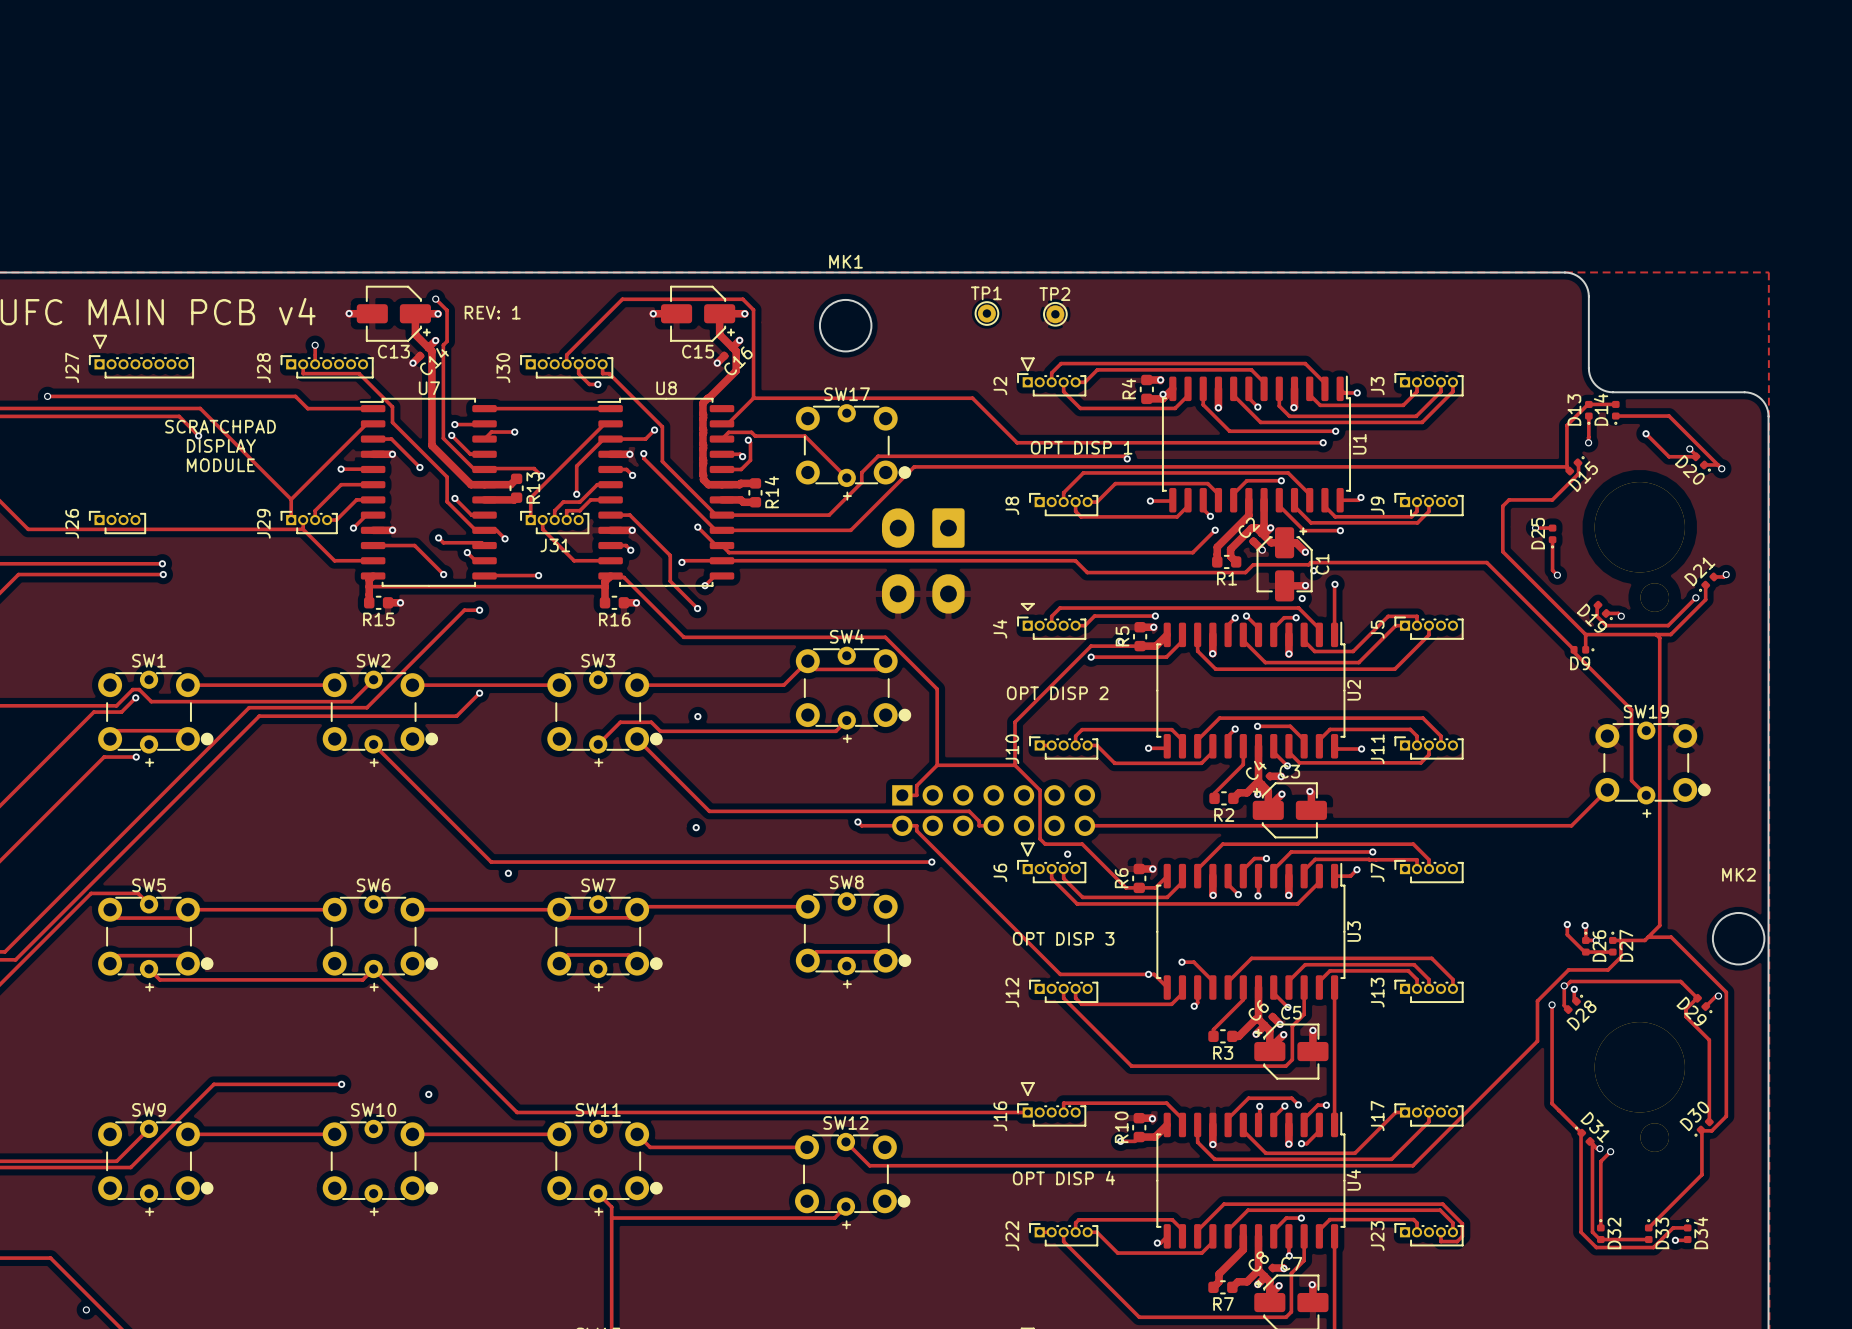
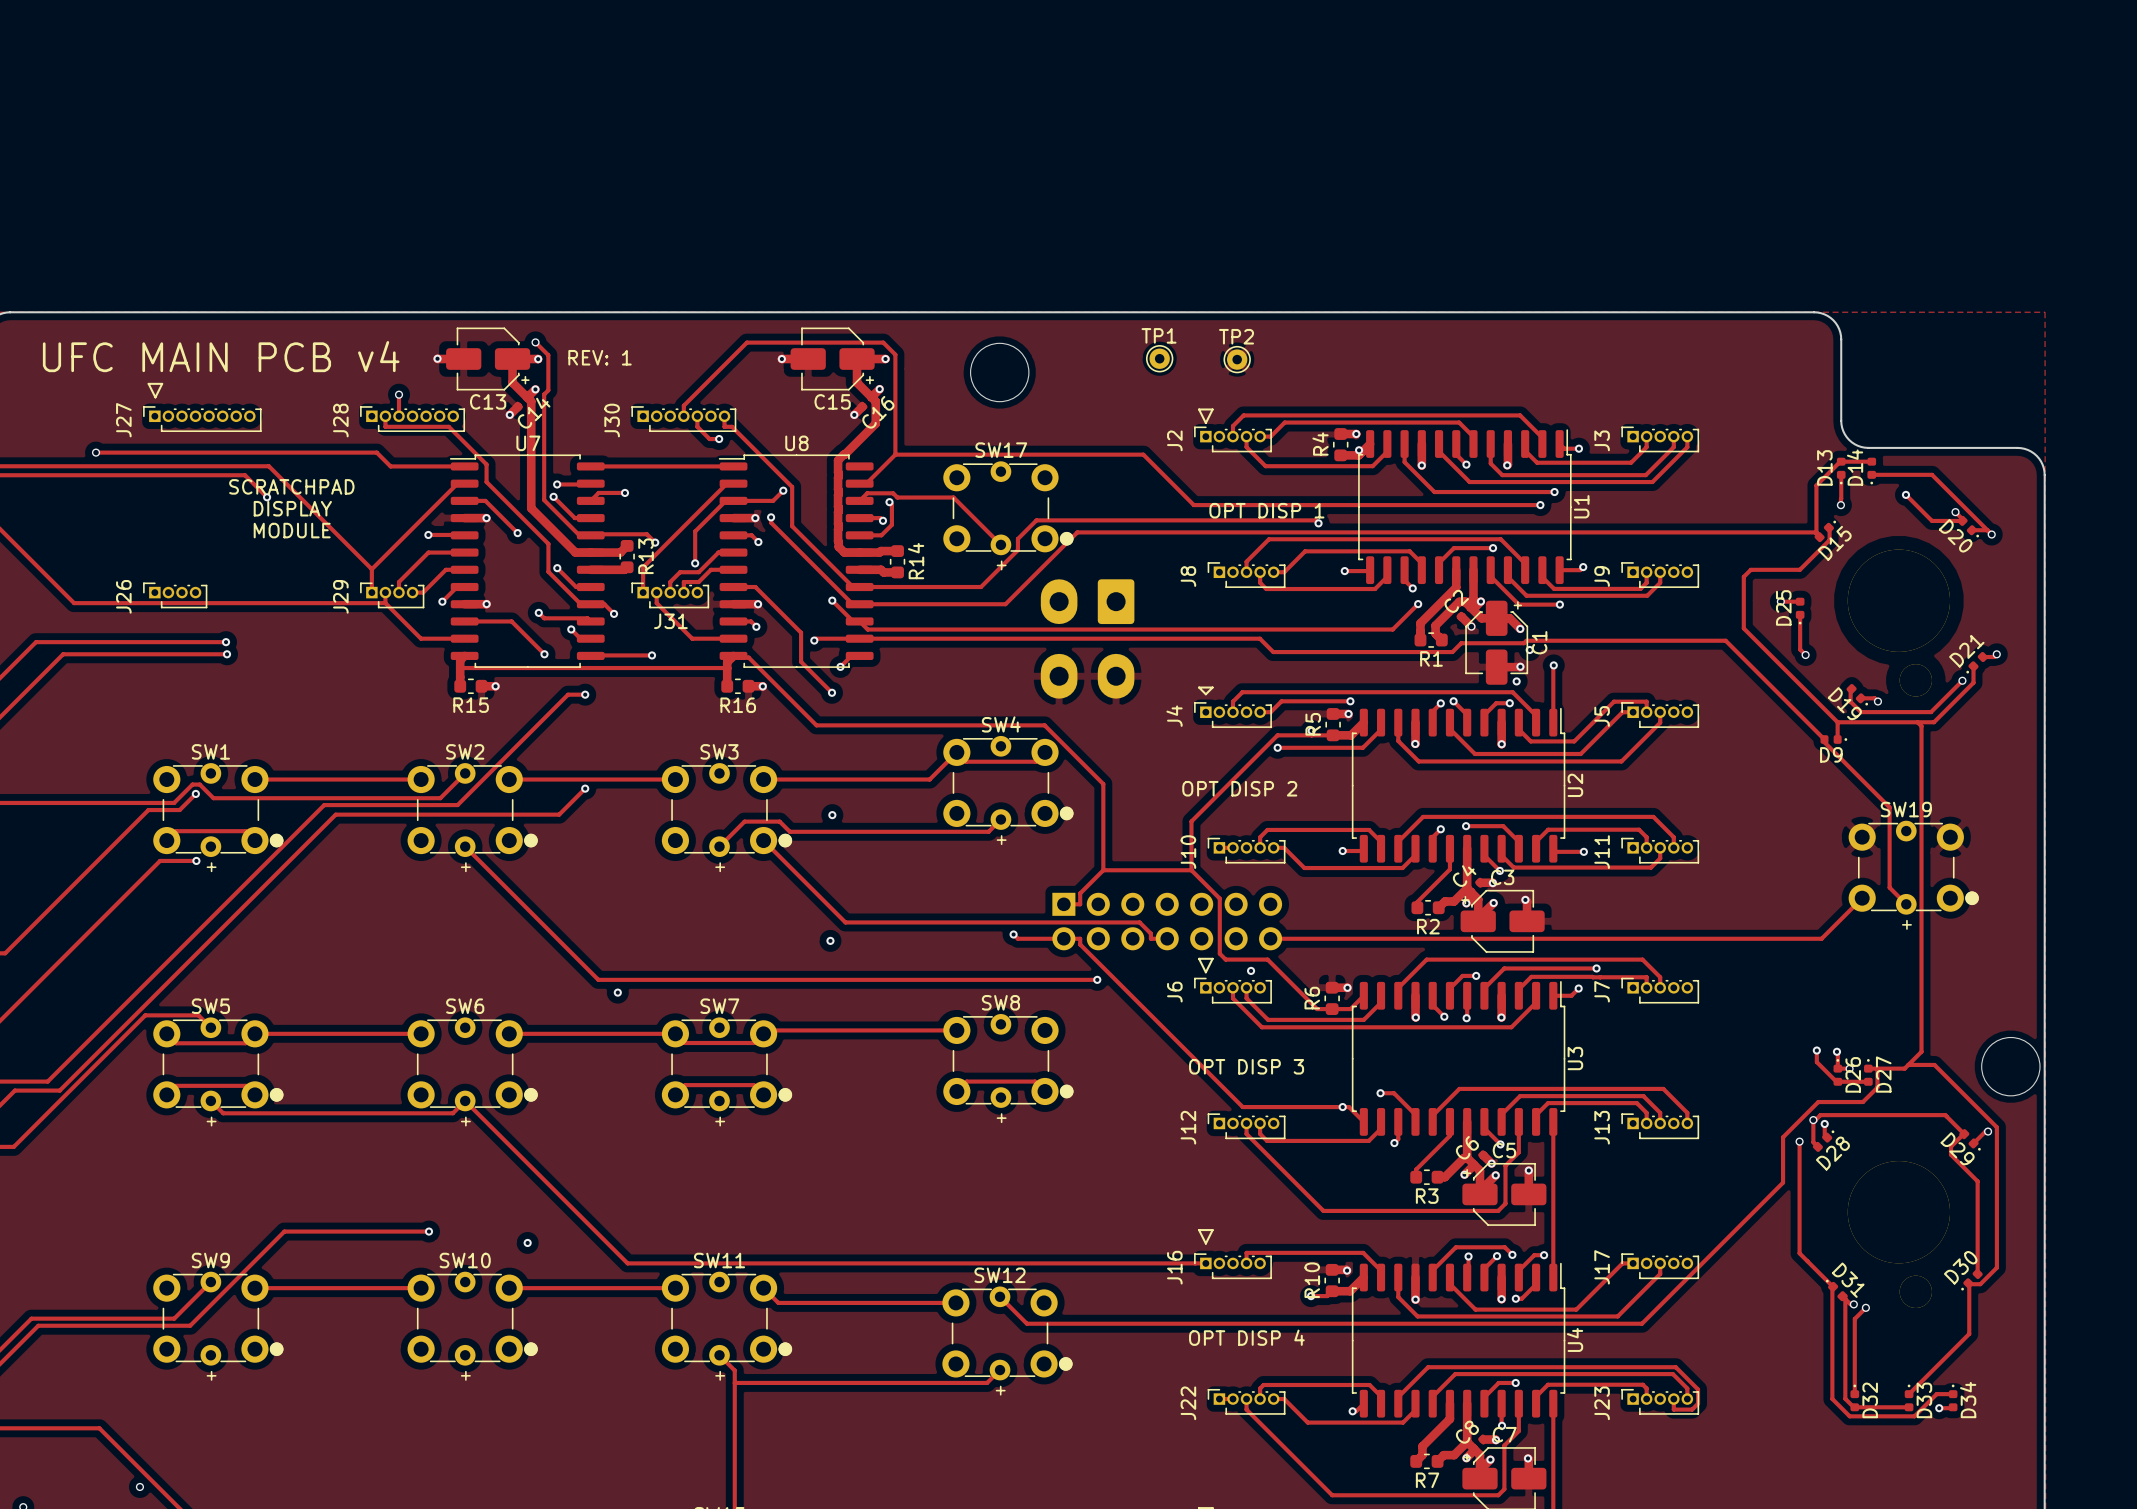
MK1 name: MK1 (845, 261) -> none
MK2 name: MK2 (1738, 874) -> none

